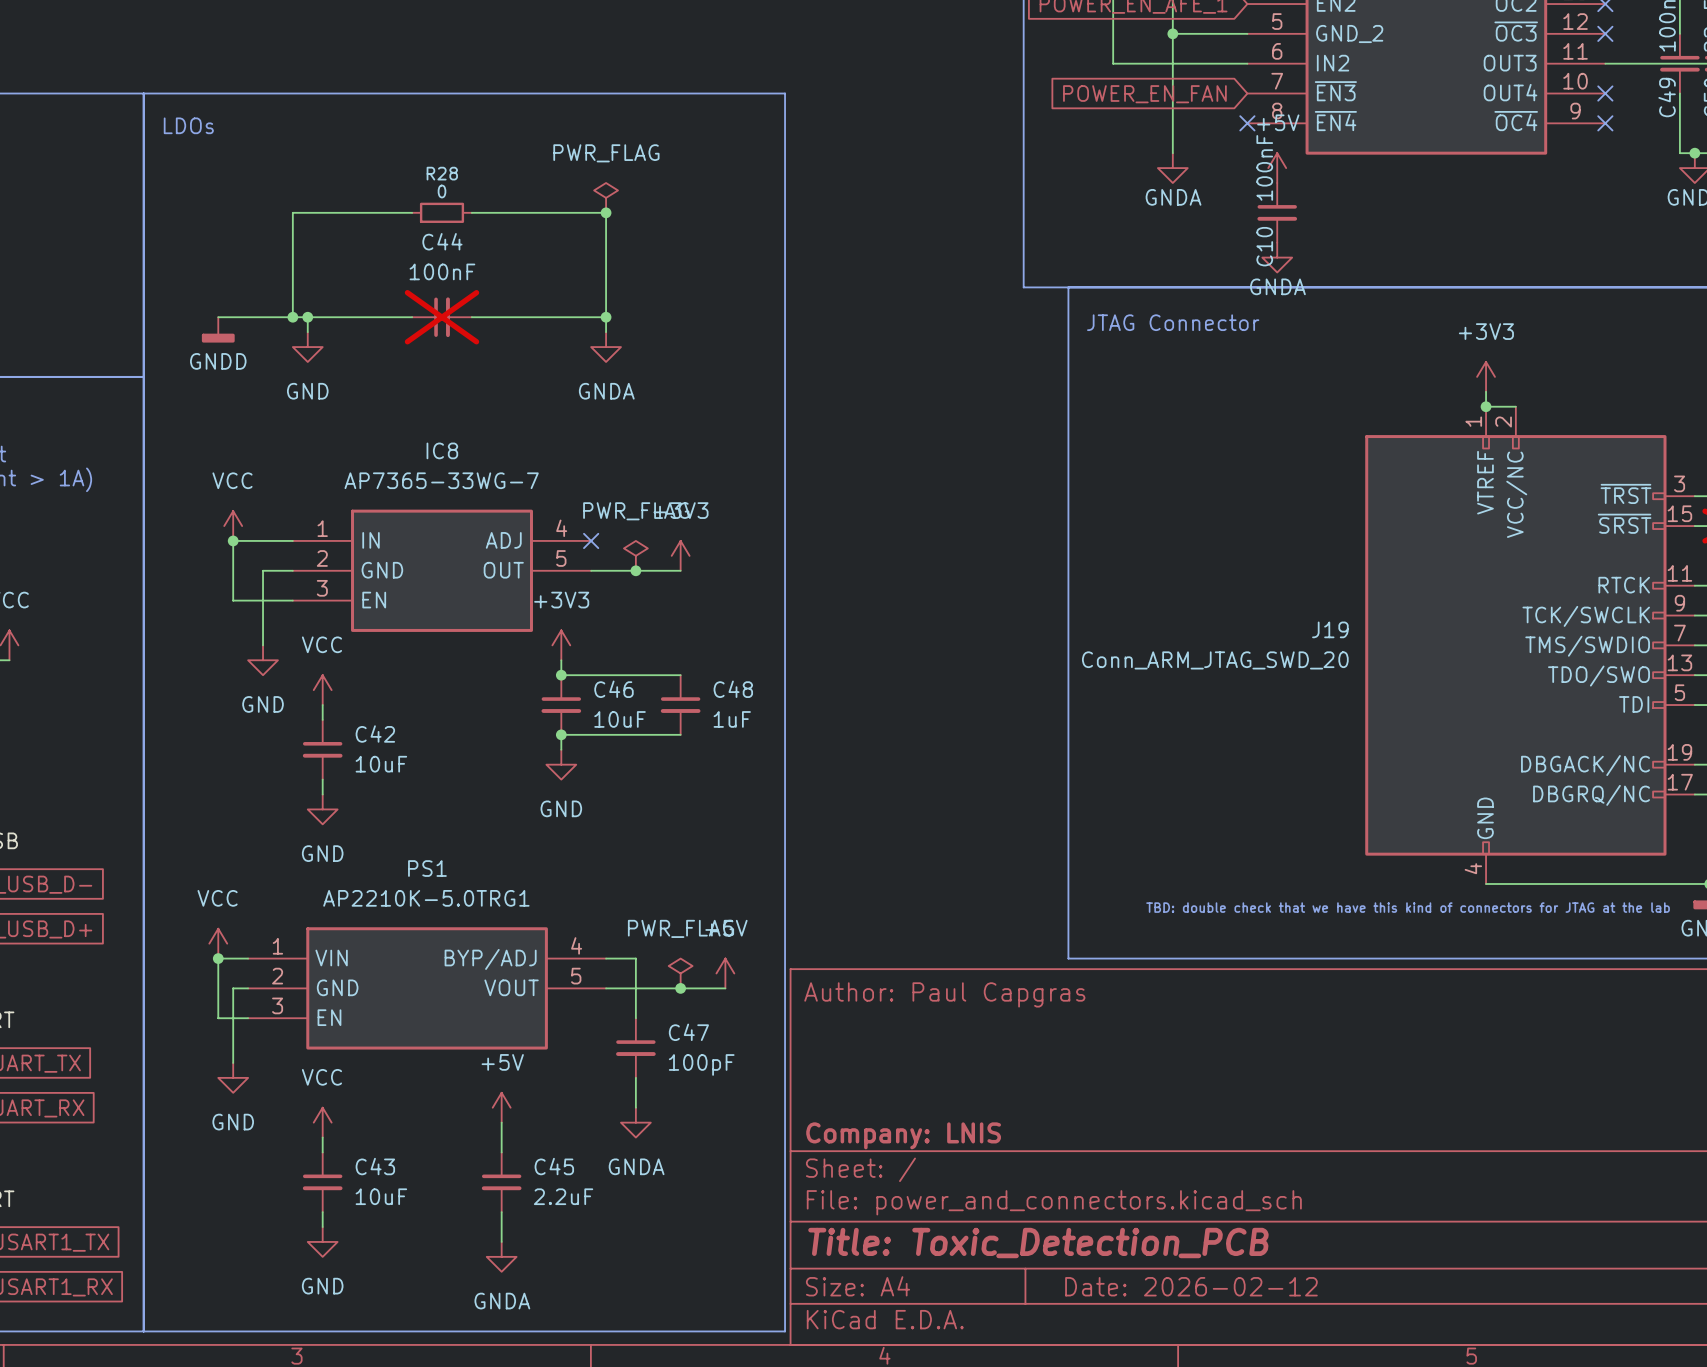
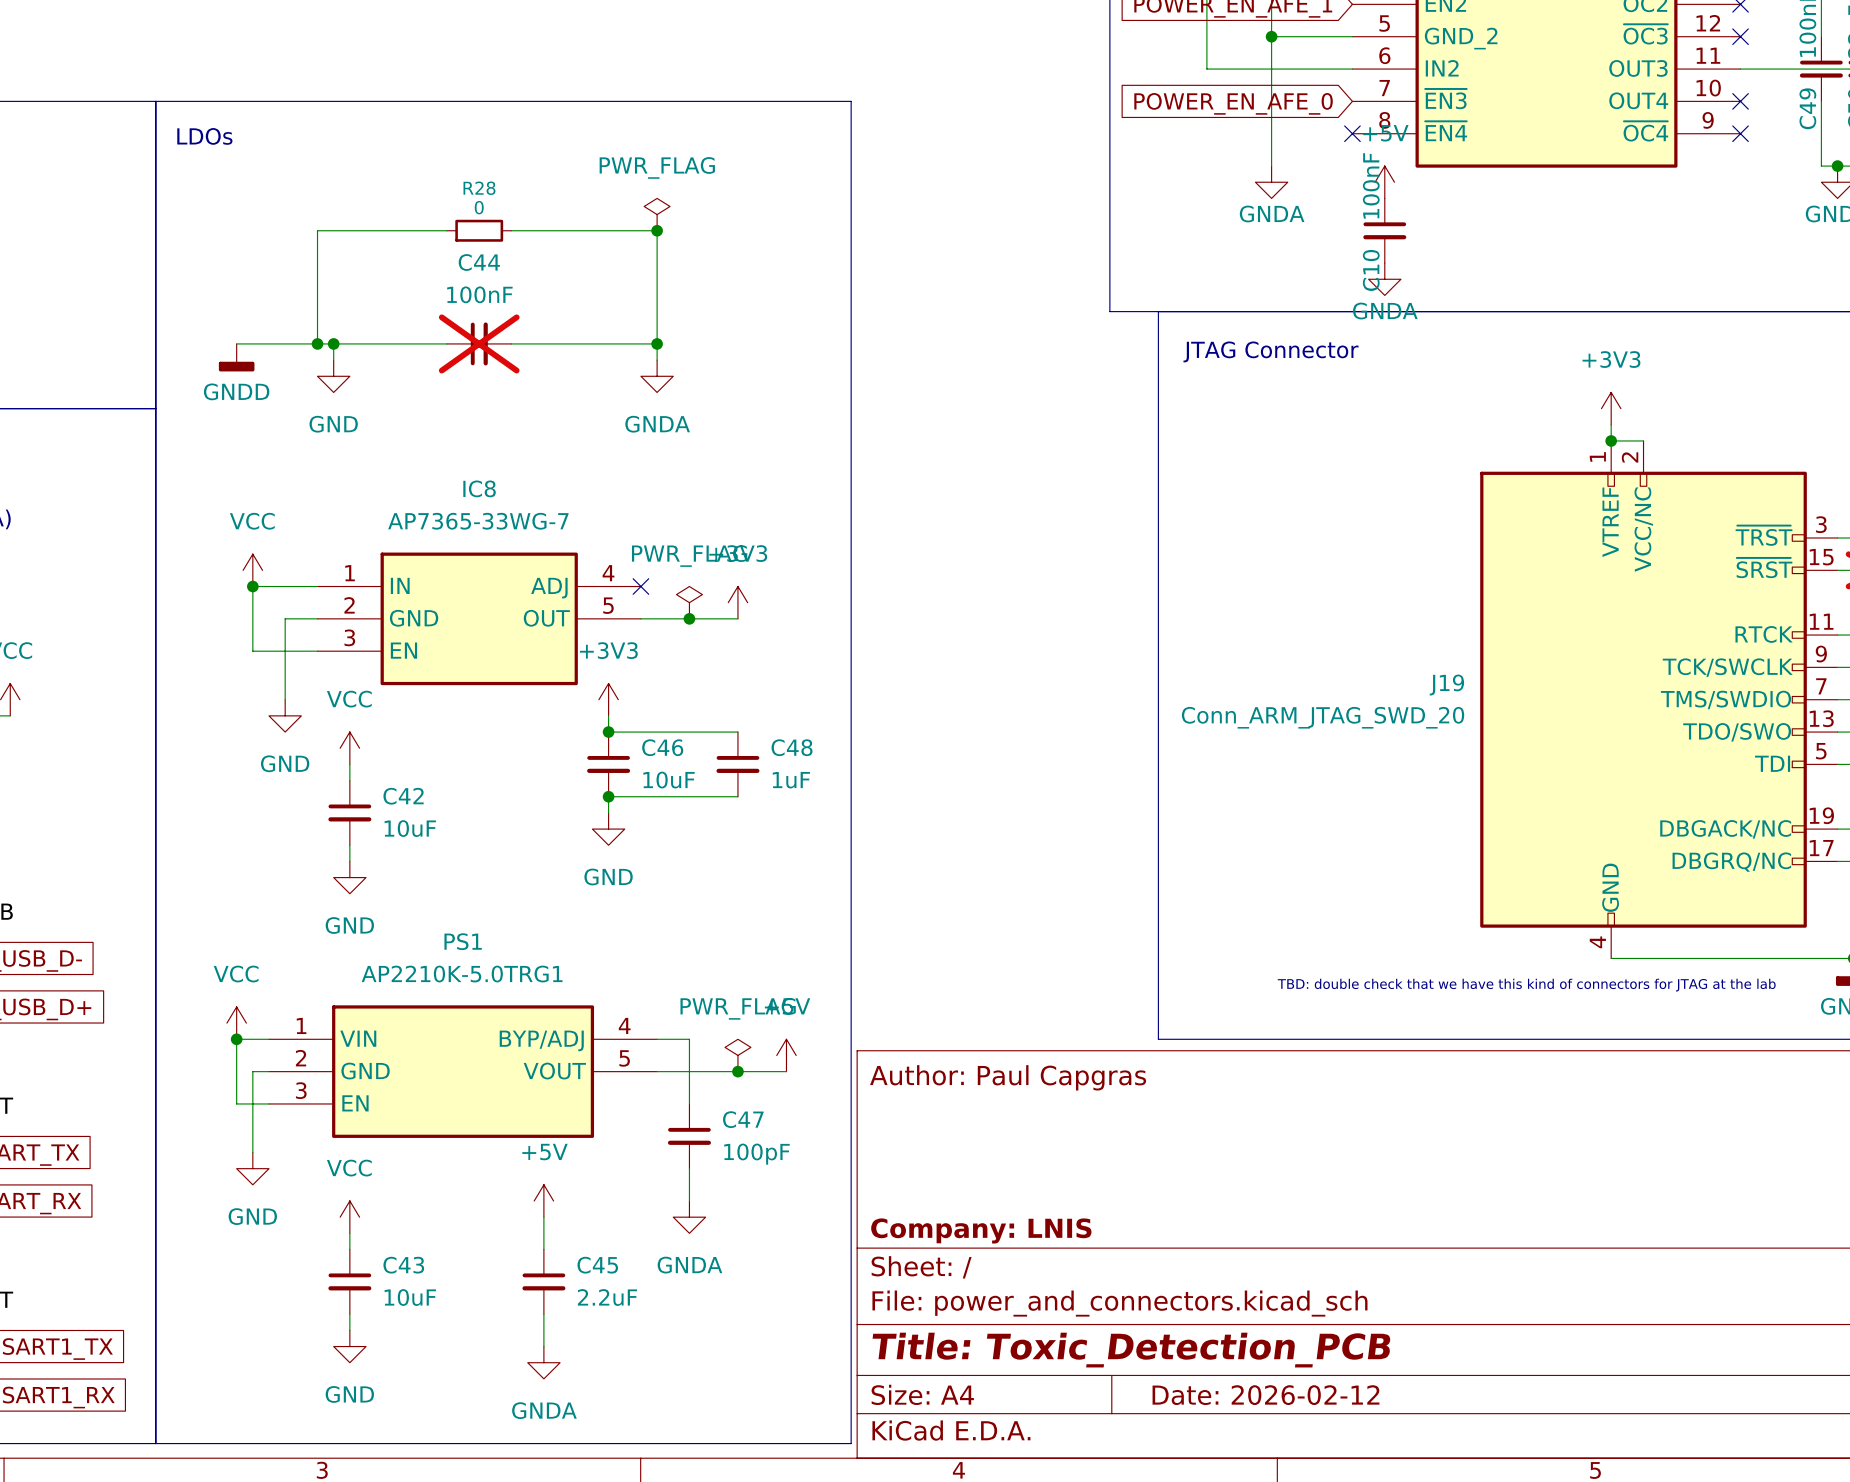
global label: POWER_EN_FAN (1144, 94) -> POWER_EN_AFE_0 (1233, 103)

